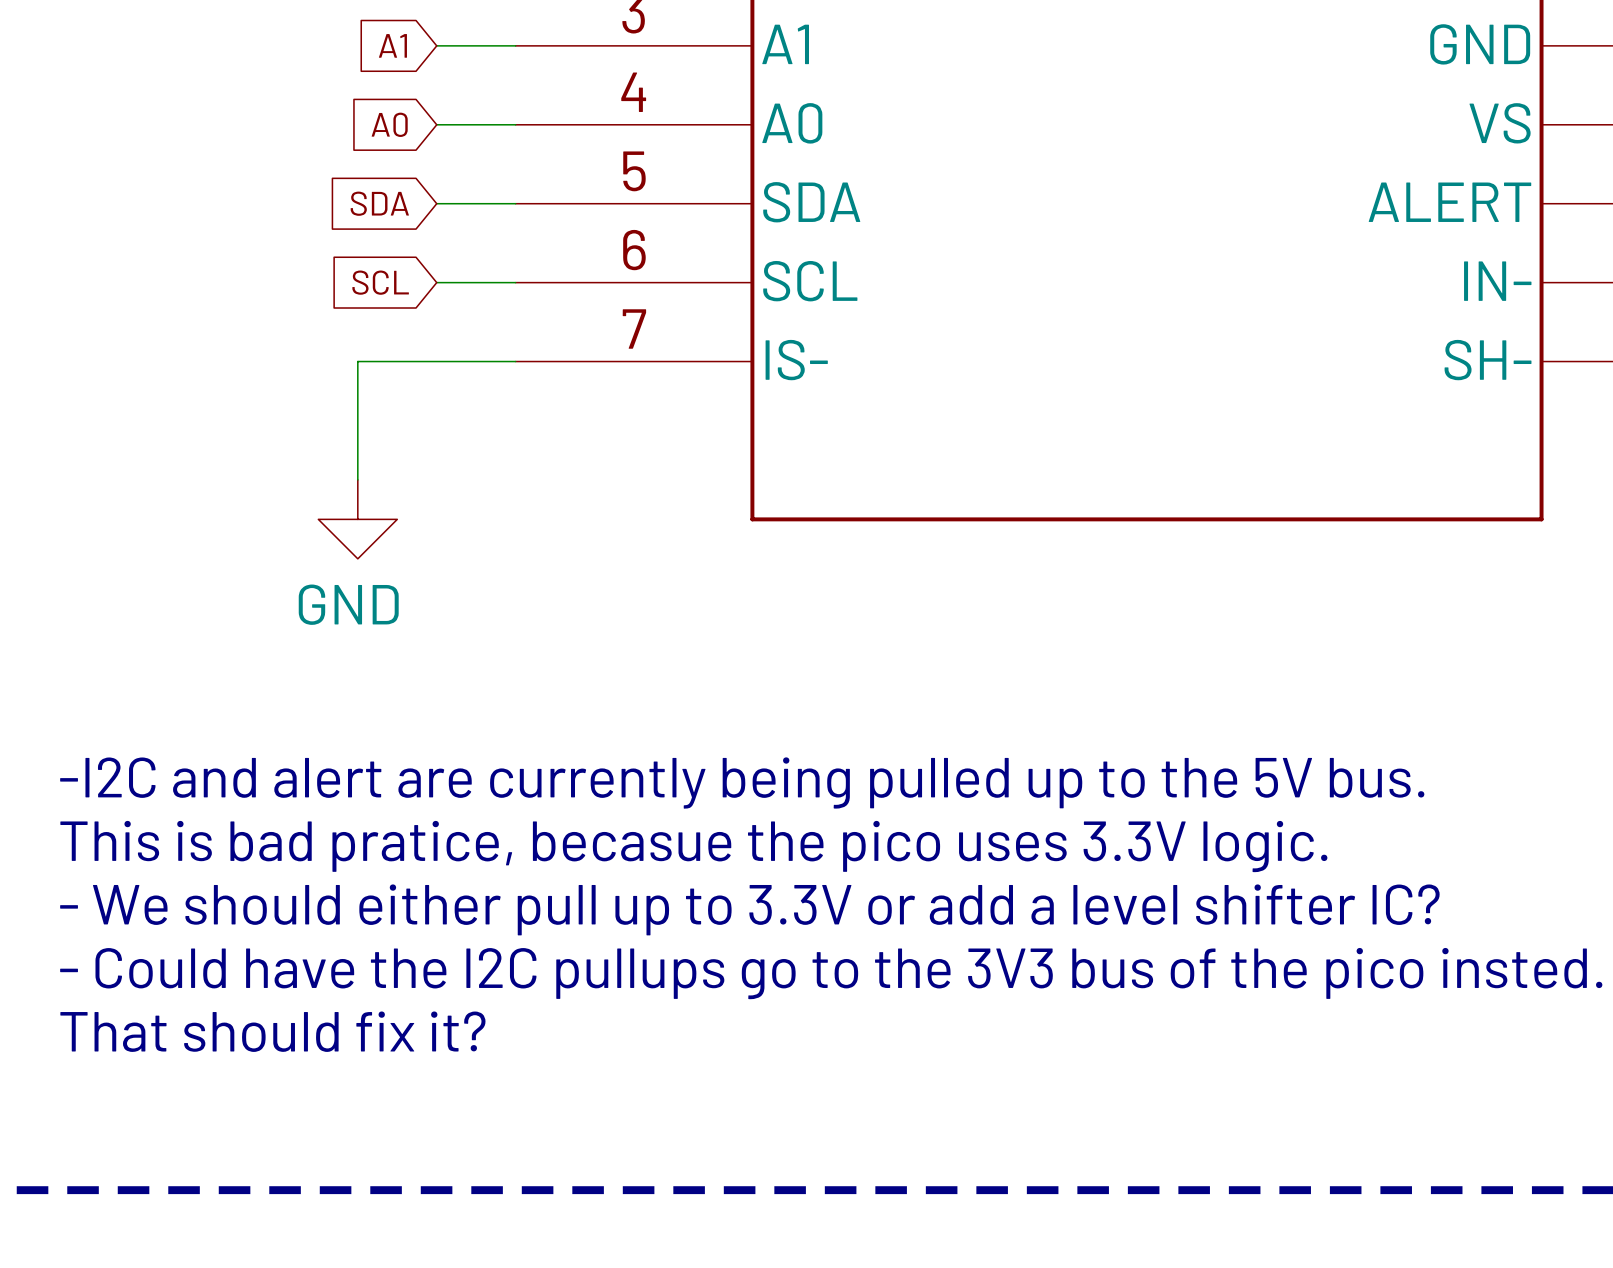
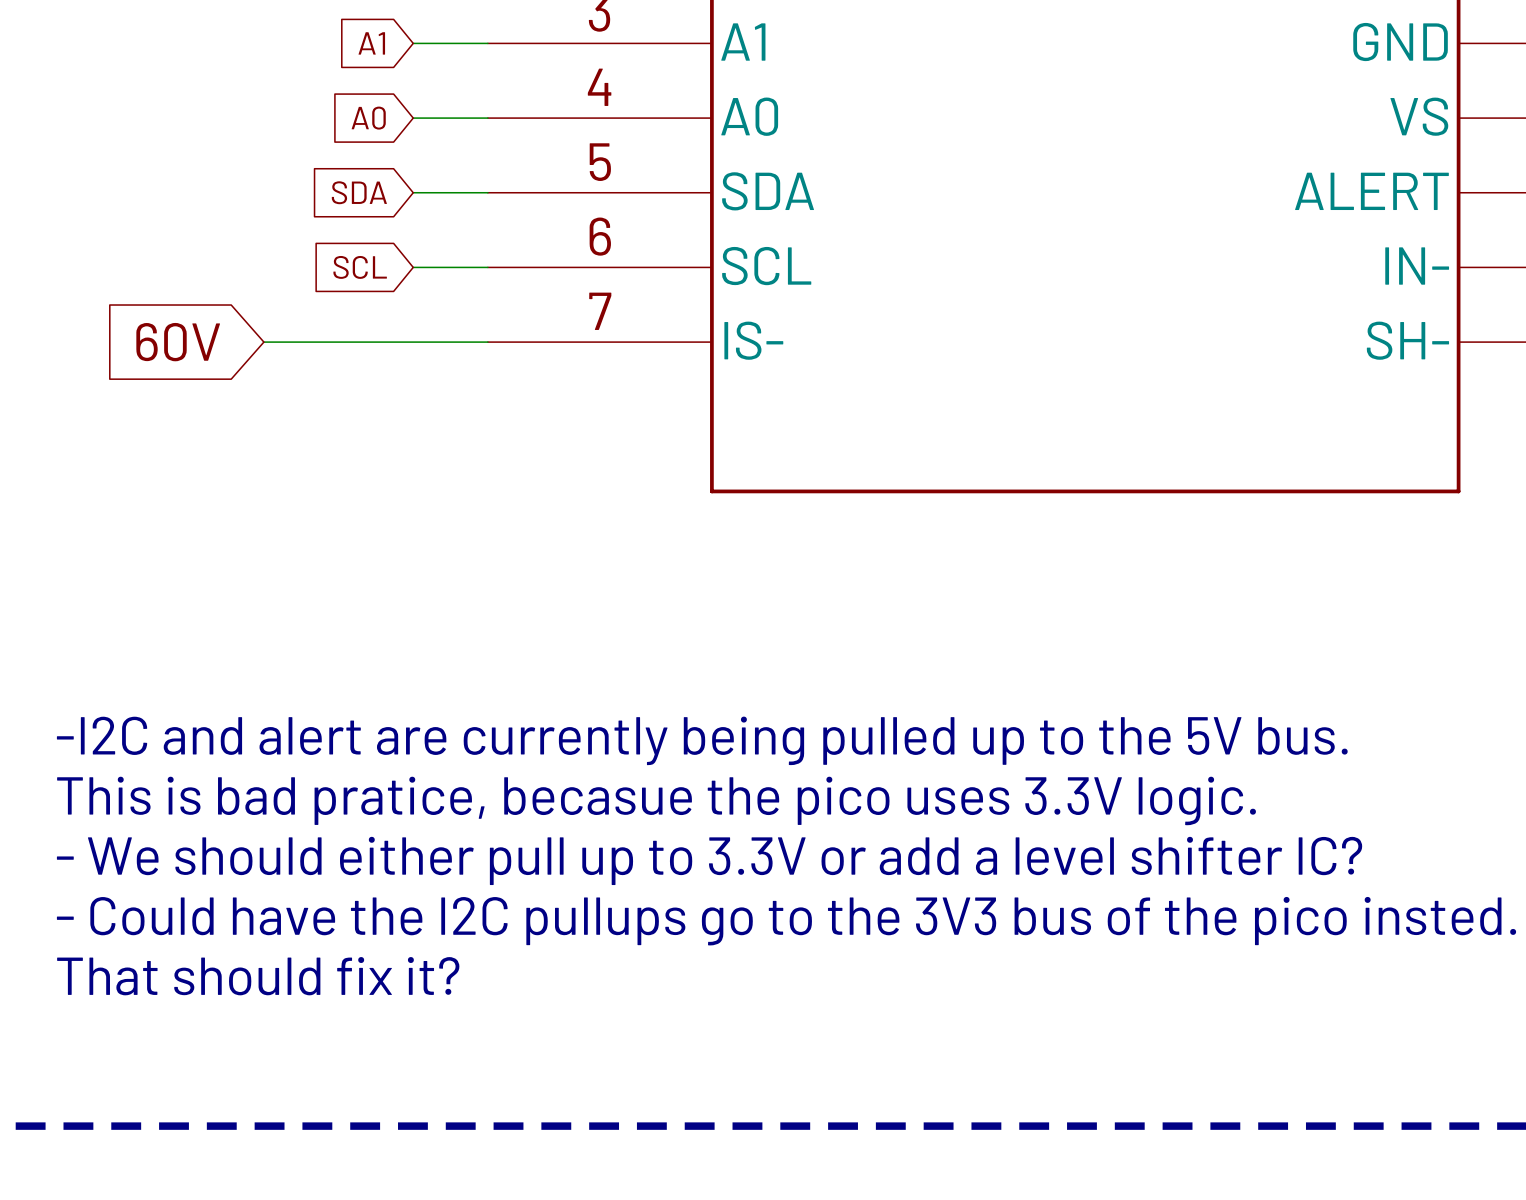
global label: none -> 60V (178, 342)
wire: (357, 361) (357, 479) -> (338, 342) (263, 342)
power symbol: GND (357, 519) -> none

